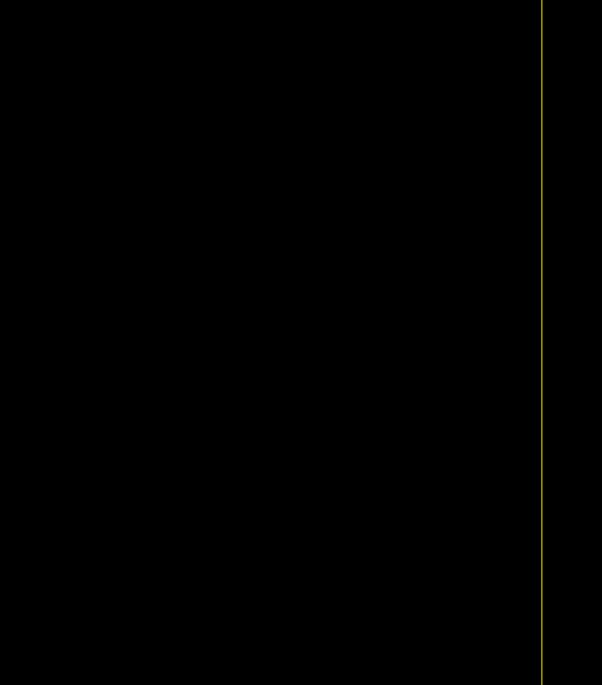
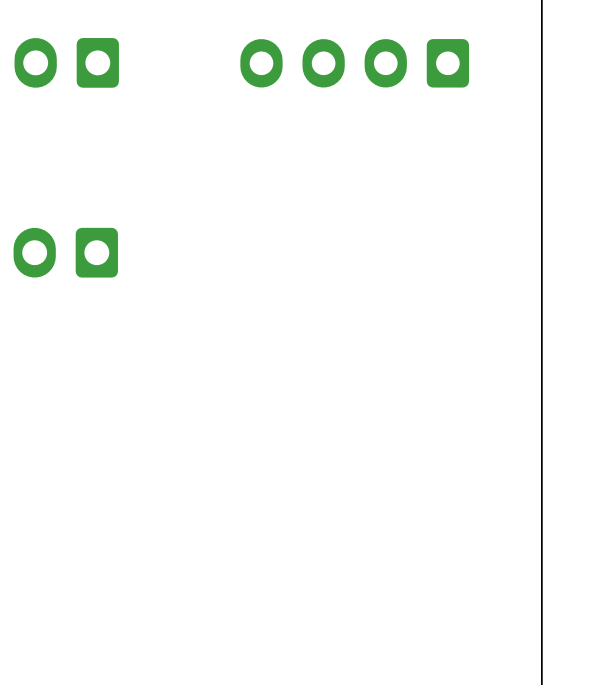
part: none -> (66, 62)
part: none -> (354, 63)
part: none -> (65, 252)

